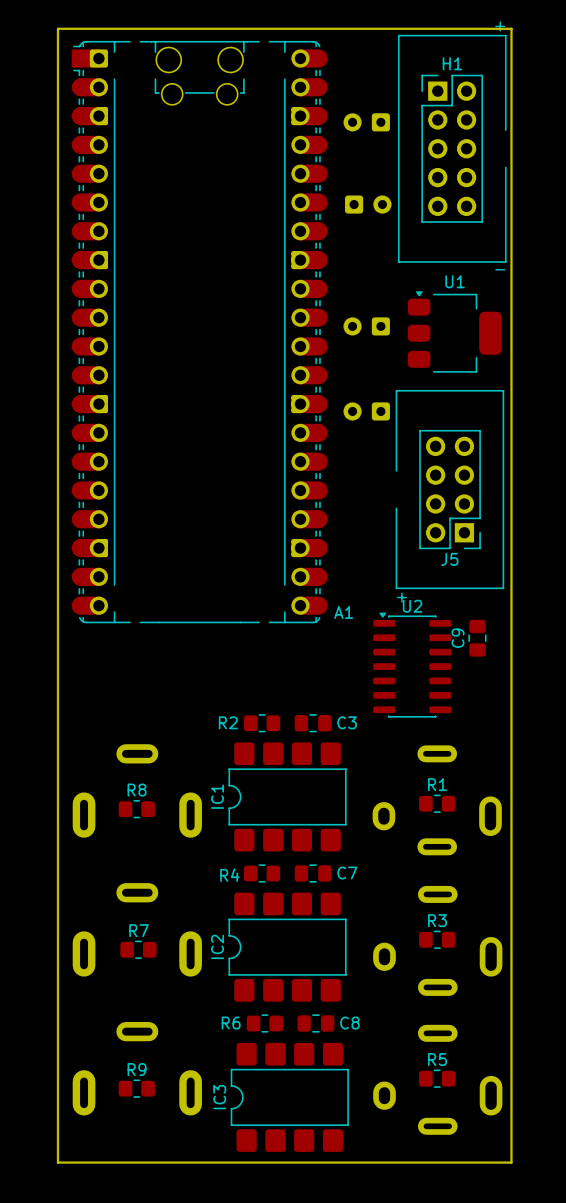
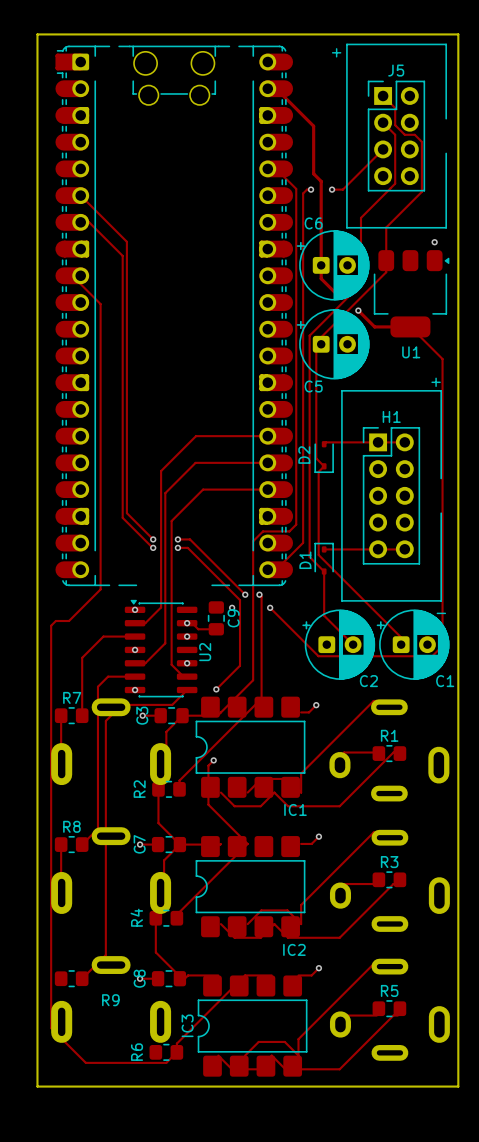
track: none -> (276, 88) (313, 126) (313, 173) (321, 181) (321, 278) (337, 294)
track: none -> (383, 95) (395, 108) (395, 125) (404, 134) (414, 134) (421, 141) (421, 191) (386, 227) (386, 272) (321, 337) (321, 344) (316, 349) (316, 458) (324, 466) (318, 471) (318, 554) (401, 637) (401, 644)
part: (366, 122) -> none
track: none -> (383, 122) (395, 134) (395, 183) (361, 217) (361, 284) (309, 335) (309, 557) (324, 571) (324, 615) (353, 644)
H1 position: (452, 148) -> (391, 495)
track: none -> (383, 149) (342, 189) (332, 189)
track: none -> (276, 168) (296, 188) (296, 524) (289, 531) (262, 531) (253, 541) (253, 680) (217, 715) (182, 715) (166, 731) (166, 781) (158, 789) (158, 823) (179, 844)
track: none -> (311, 189) (306, 189) (303, 193) (303, 542) (276, 569)
via: none -> (311, 189)
via: none -> (332, 189)
track: none -> (80, 195) (126, 241) (126, 513) (153, 539)
part: (368, 204) -> none
track: none -> (72, 222) (89, 222) (122, 255) (122, 517) (153, 547)
via: none -> (434, 242)
H1 text position: - (500, 269) -> - (441, 613)
U1 name position: U1 (455, 281) -> U1 (411, 352)
track: none -> (72, 275) (100, 304) (100, 589) (69, 620) (55, 620) (51, 625) (51, 1028) (85, 1062) (166, 1062) (176, 1052) (176, 1043) (245, 975) (271, 975)
C6 side: bottom (366, 326) -> top (333, 265)
track: none -> (358, 310) (374, 326) (410, 326) (442, 359) (442, 645) (432, 656) (318, 656) (269, 607)
via: none -> (358, 310)
U1 rotation: 0° (454, 331) -> 90° clockwise (411, 293)
A1: (199, 332) -> none
part: none -> (174, 315)
J5 footprint: [395, 390, 504, 589] -> [346, 43, 447, 229]
C5 side: bottom (366, 411) -> top (333, 344)
track: none -> (267, 436) (196, 436) (161, 471) (161, 607) (145, 623) (135, 623)
track: none -> (404, 442) (326, 442) (324, 444)
D2: none -> (324, 456)
track: none -> (267, 462) (195, 462) (165, 493) (165, 643) (145, 663) (135, 663)
track: none -> (267, 489) (203, 489) (171, 521) (171, 664) (183, 676) (187, 676)
J5 name position: J5 (449, 559) -> J5 (396, 70)
via: none -> (153, 539)
track: none -> (177, 539) (190, 539) (245, 594)
via: none -> (177, 539)
via: none -> (153, 547)
track: none -> (177, 547) (187, 547) (240, 600) (240, 665) (216, 689)
via: none -> (177, 547)
track: none -> (404, 549) (324, 549)
D1: none -> (324, 558)
U2 name rotation: 0° (412, 606) -> 90° counterclockwise (205, 652)
U2 name position: U2 (412, 606) -> U2 (205, 652)
via: none -> (245, 594)
track: none -> (259, 594) (261, 596) (261, 698) (179, 780) (179, 789)
via: none -> (259, 594)
C9 name position: C9 (457, 638) -> C9 (233, 618)
C9 position: (477, 638) -> (216, 618)
via: none -> (232, 607)
via: none -> (270, 607)
via: none -> (135, 609)
track: none -> (187, 623) (192, 623) (198, 629) (216, 629)
via: none -> (187, 623)
U2 position: (412, 665) -> (161, 648)
track: none -> (135, 636) (103, 636) (82, 657) (82, 715)
via: none -> (187, 636)
C2: none -> (338, 644)
C1: none -> (413, 644)
via: none -> (135, 649)
via: none -> (187, 663)
track: none -> (135, 676) (108, 676) (97, 686) (97, 828) (82, 844)
R2 name rotation: 0° (228, 722) -> 90° counterclockwise (139, 789)
C3 name rotation: 0° (347, 722) -> 90° counterclockwise (142, 715)
C3 name position: C3 (347, 722) -> C3 (142, 715)
R2 position: (262, 723) -> (168, 789)
C3 position: (313, 723) -> (171, 715)
via: none -> (216, 689)
via: none -> (135, 690)
track: none -> (187, 690) (172, 704) (121, 704) (105, 720) (105, 955) (82, 978)
track: none -> (387, 700) (373, 700) (301, 773) (301, 792) (287, 778) (261, 778) (247, 792)
track: none -> (316, 705) (309, 712) (301, 712)
via: none -> (316, 705)
track: none -> (61, 715) (61, 748) (64, 752)
track: none -> (142, 715) (160, 715)
via: none -> (142, 715)
IC1 name rotation: 0° (217, 796) -> 90° clockwise (295, 809)
IC1 name position: IC1 (217, 796) -> IC1 (295, 809)
track: none -> (376, 752) (344, 752) (337, 758)
track: none -> (397, 752) (393, 752) (339, 806) (288, 806) (274, 792) (260, 806) (234, 806) (220, 792)
R8 position: (136, 809) -> (71, 844)
track: none -> (213, 760) (208, 765) (208, 804) (247, 843) (176, 914) (176, 918)
via: none -> (213, 760)
R4 position: (262, 873) -> (166, 918)
C7 position: (313, 873) -> (168, 844)
C7 name rotation: 0° (347, 873) -> 90° counterclockwise (139, 844)
C7 name position: C7 (347, 873) -> C7 (139, 844)
R4 name rotation: 0° (229, 875) -> 90° counterclockwise (136, 917)
track: none -> (387, 832) (373, 832) (301, 905) (301, 924) (287, 910) (261, 910) (247, 924)
track: none -> (318, 836) (311, 843) (301, 843)
via: none -> (318, 836)
track: none -> (61, 844) (62, 881)
track: none -> (140, 844) (158, 844)
via: none -> (140, 844)
track: none -> (179, 844) (164, 860) (164, 909) (155, 918) (155, 952) (179, 976) (179, 978) (184, 978) (188, 975) (218, 975)
track: none -> (220, 843) (179, 844)
track: none -> (376, 884) (344, 884) (337, 890)
track: none -> (397, 884) (393, 884) (339, 937) (288, 937) (274, 924) (260, 937) (234, 937) (220, 924)
IC2 name rotation: 0° (217, 946) -> 90° clockwise (294, 949)
IC2 name position: IC2 (217, 946) -> IC2 (294, 949)
R7 position: (138, 949) -> (71, 715)
R6 name rotation: 0° (231, 1023) -> 90° counterclockwise (137, 1052)
R6 position: (264, 1023) -> (166, 1052)
C8 position: (315, 1023) -> (168, 978)
C8 name rotation: 0° (349, 1023) -> 90° counterclockwise (139, 978)
C8 name position: C8 (349, 1023) -> C8 (139, 978)
track: none -> (387, 963) (373, 963) (298, 1039) (298, 1055) (284, 1041) (258, 1041) (245, 1055)
track: none -> (318, 968) (311, 975) (298, 975)
via: none -> (318, 968)
track: none -> (140, 978) (158, 978)
via: none -> (140, 978)
track: none -> (376, 1015) (344, 1015) (337, 1021)
track: none -> (397, 1015) (393, 1015) (339, 1069) (285, 1069) (271, 1055) (258, 1069) (232, 1069) (218, 1055)
R9 position: (136, 1088) -> (71, 978)

